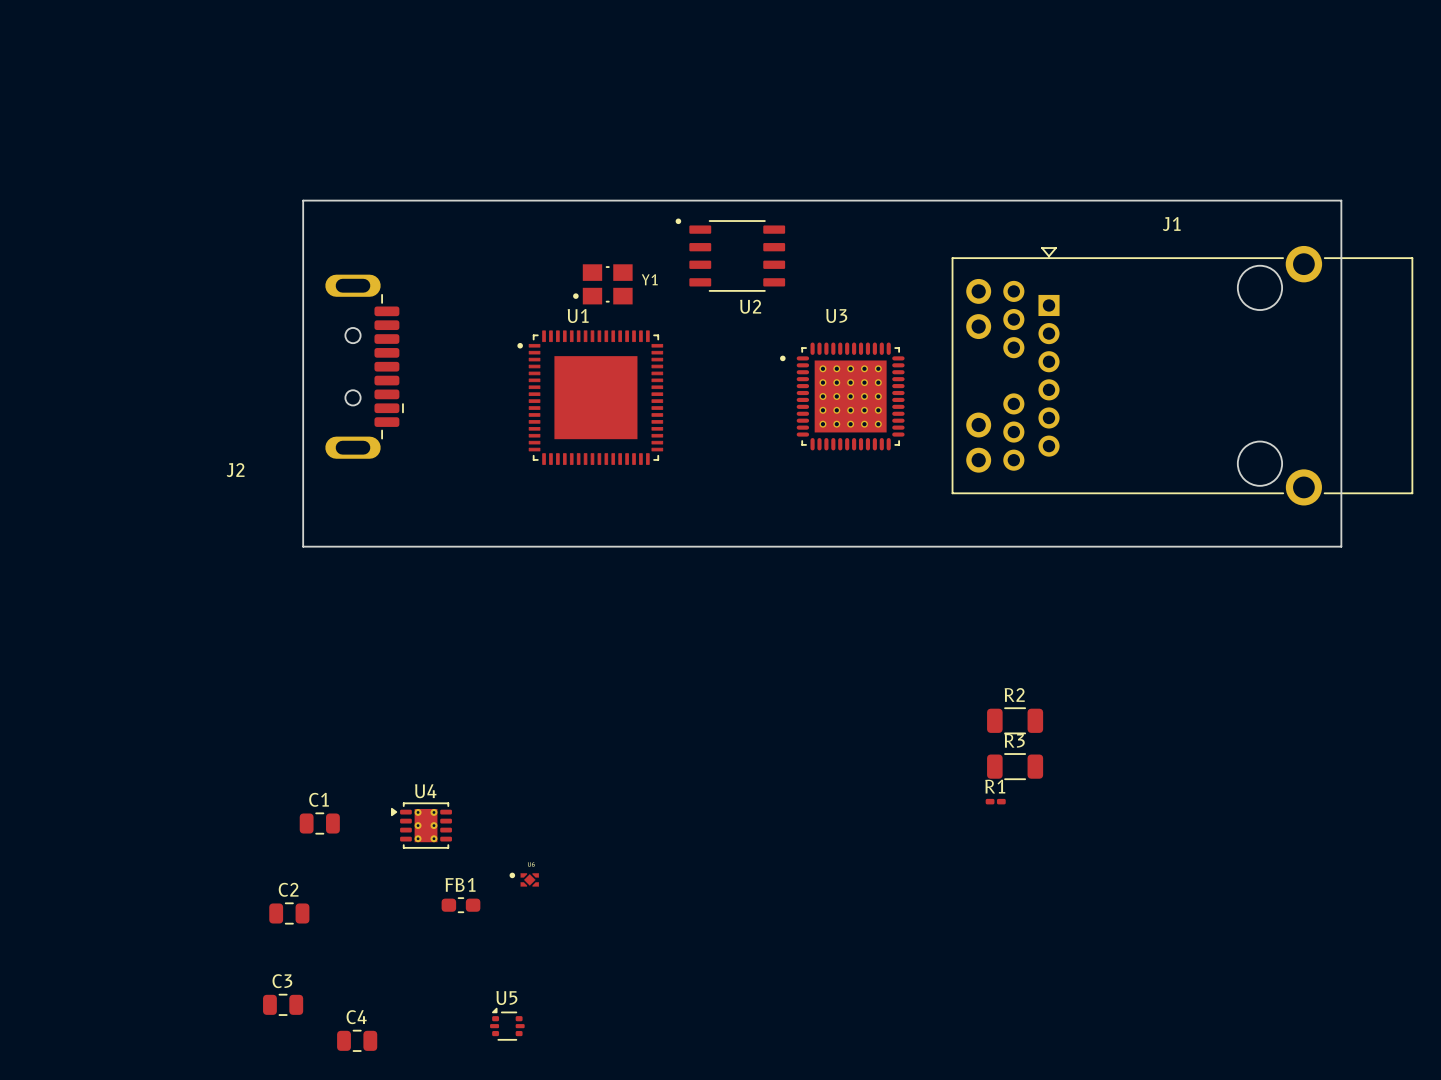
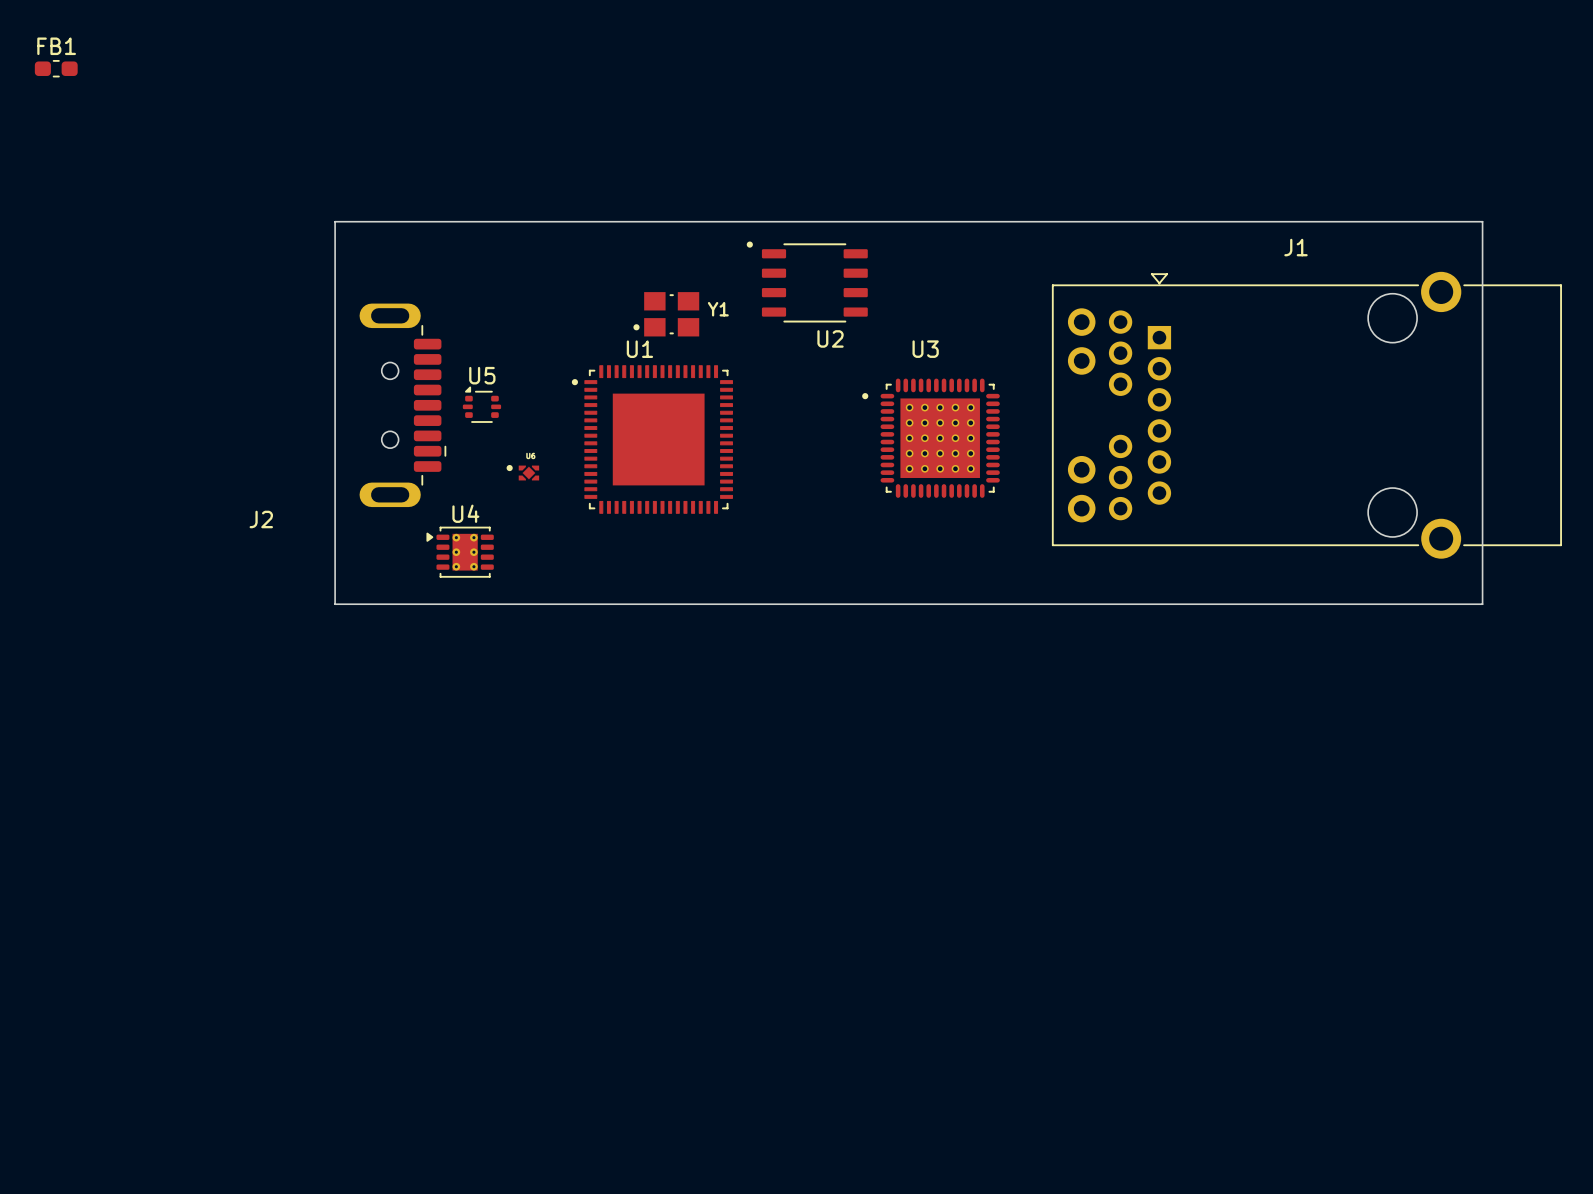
R2: (1015, 720) -> none
R3: (1015, 766) -> none
R1: (995, 801) -> none
C1: (319, 823) -> none
U4 position: (421, 825) -> (460, 552)
part position: (524, 879) -> (522, 472)
FB1 position: (460, 905) -> (56, 68)
C2: (289, 913) -> none
C3: (283, 1004) -> none
U5 position: (507, 1024) -> (481, 404)
C4: (357, 1040) -> none

